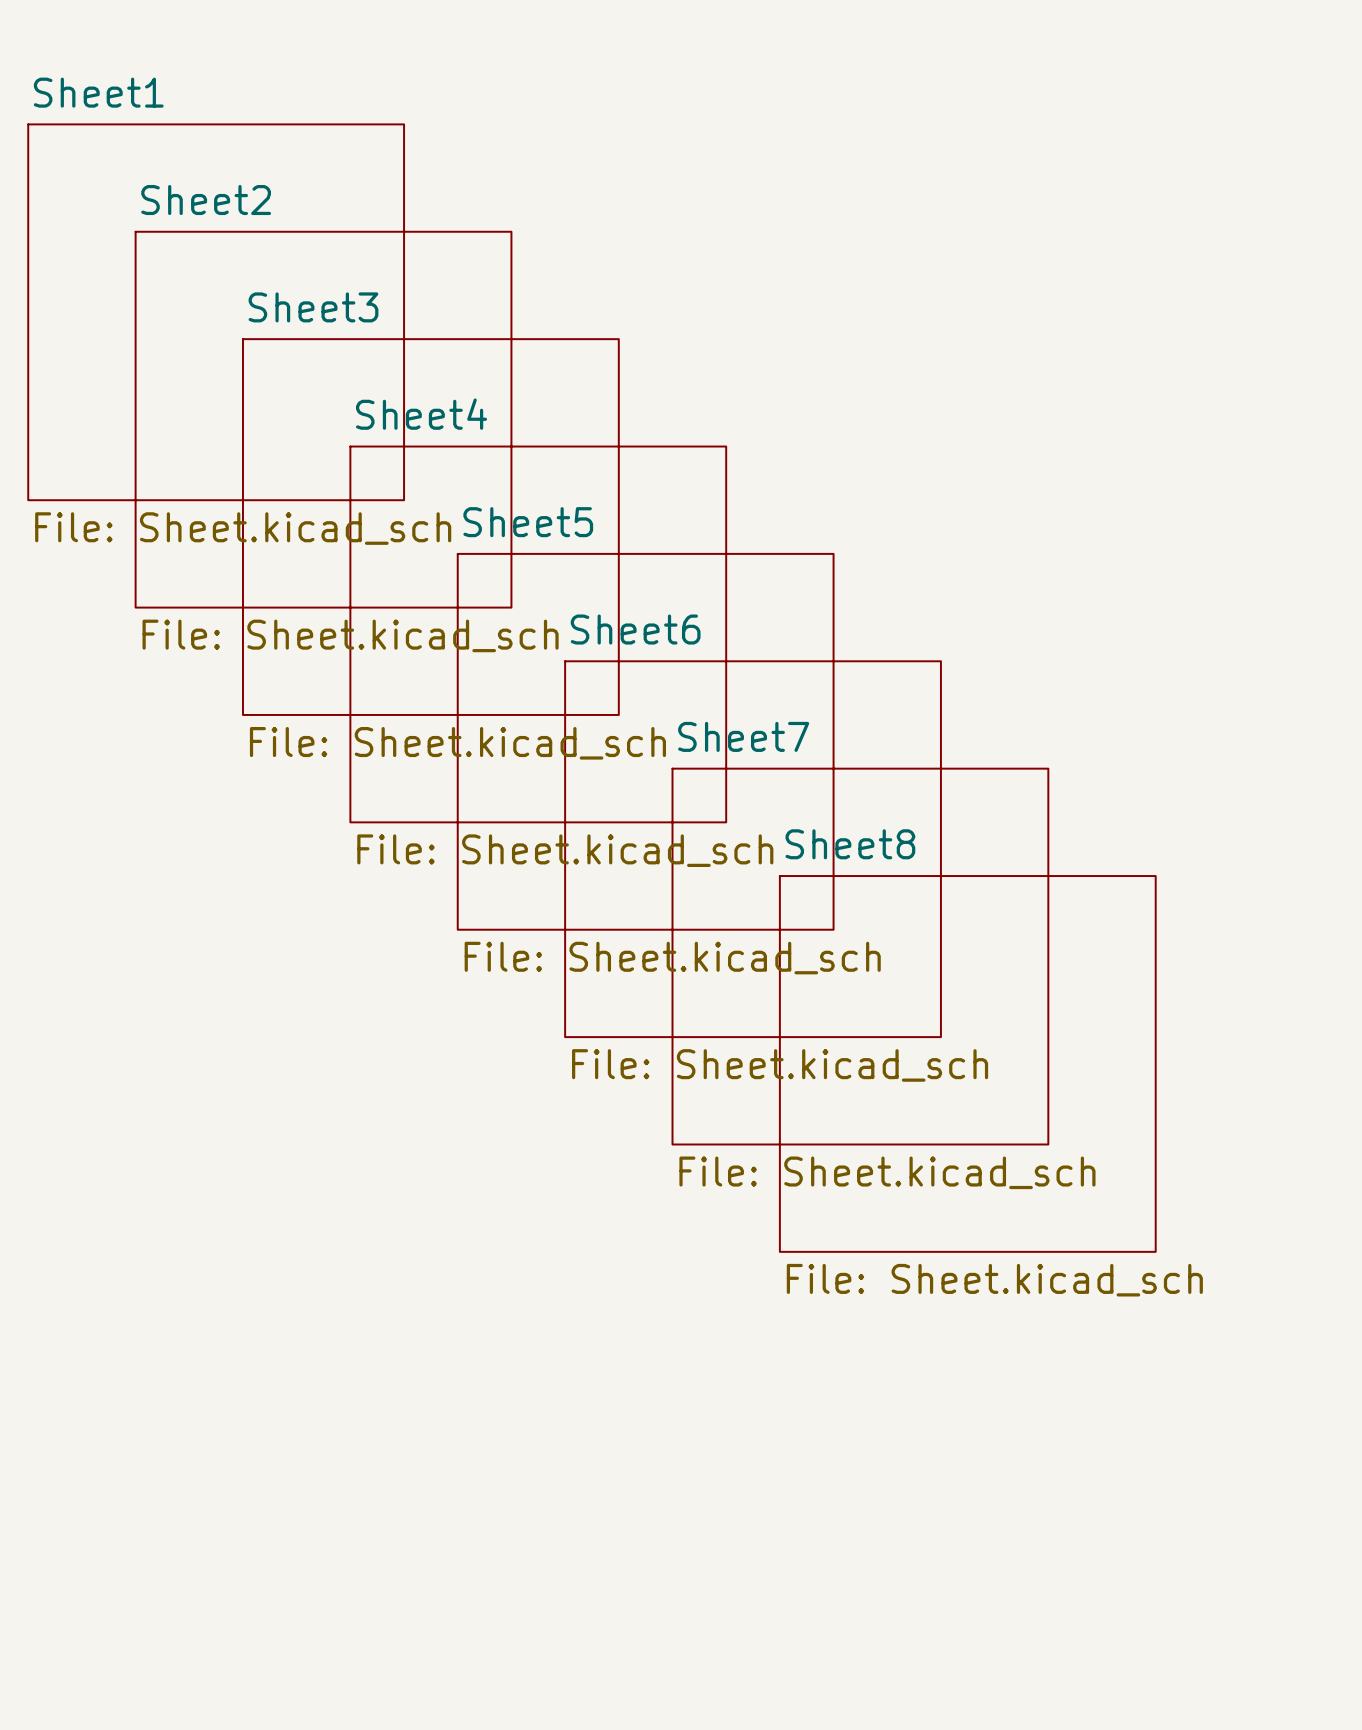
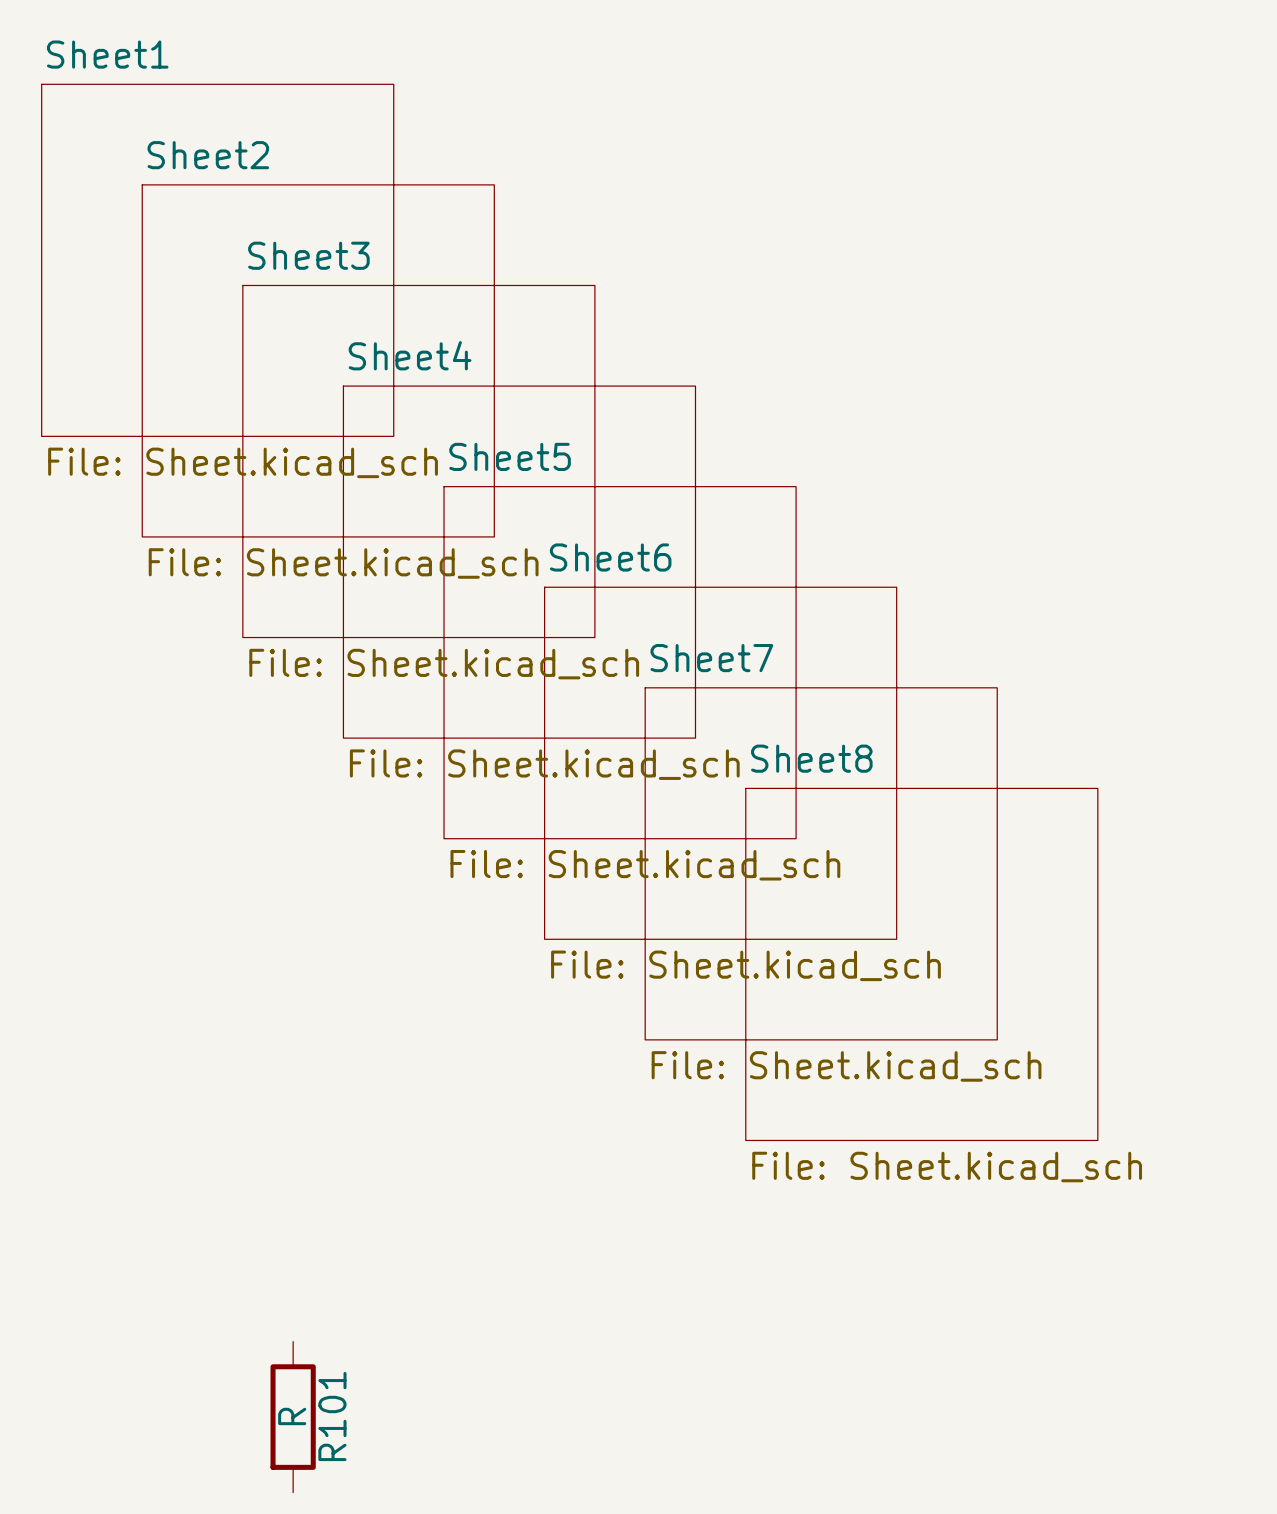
R101: none -> R (293, 1417)

